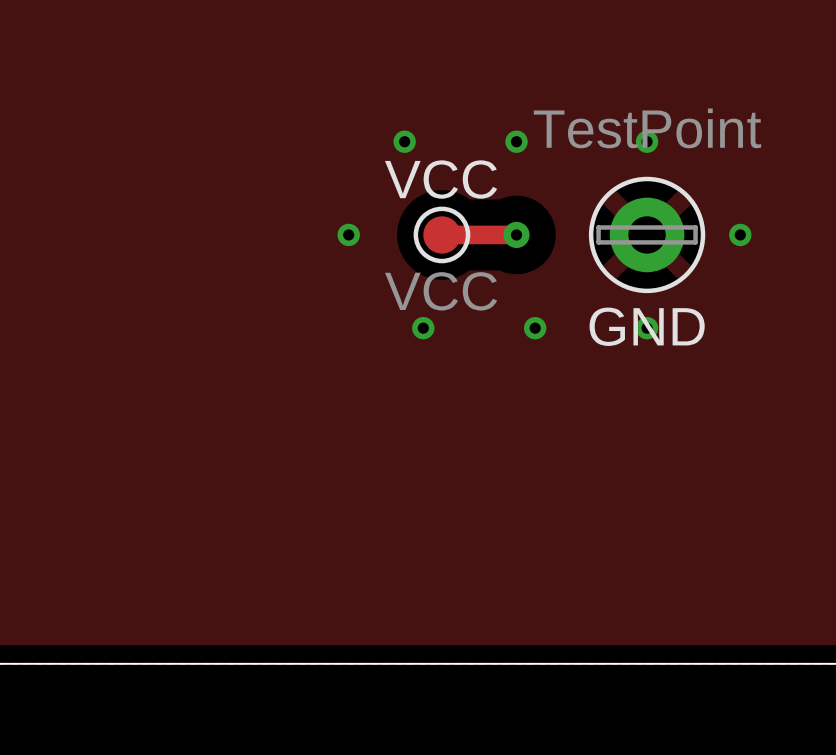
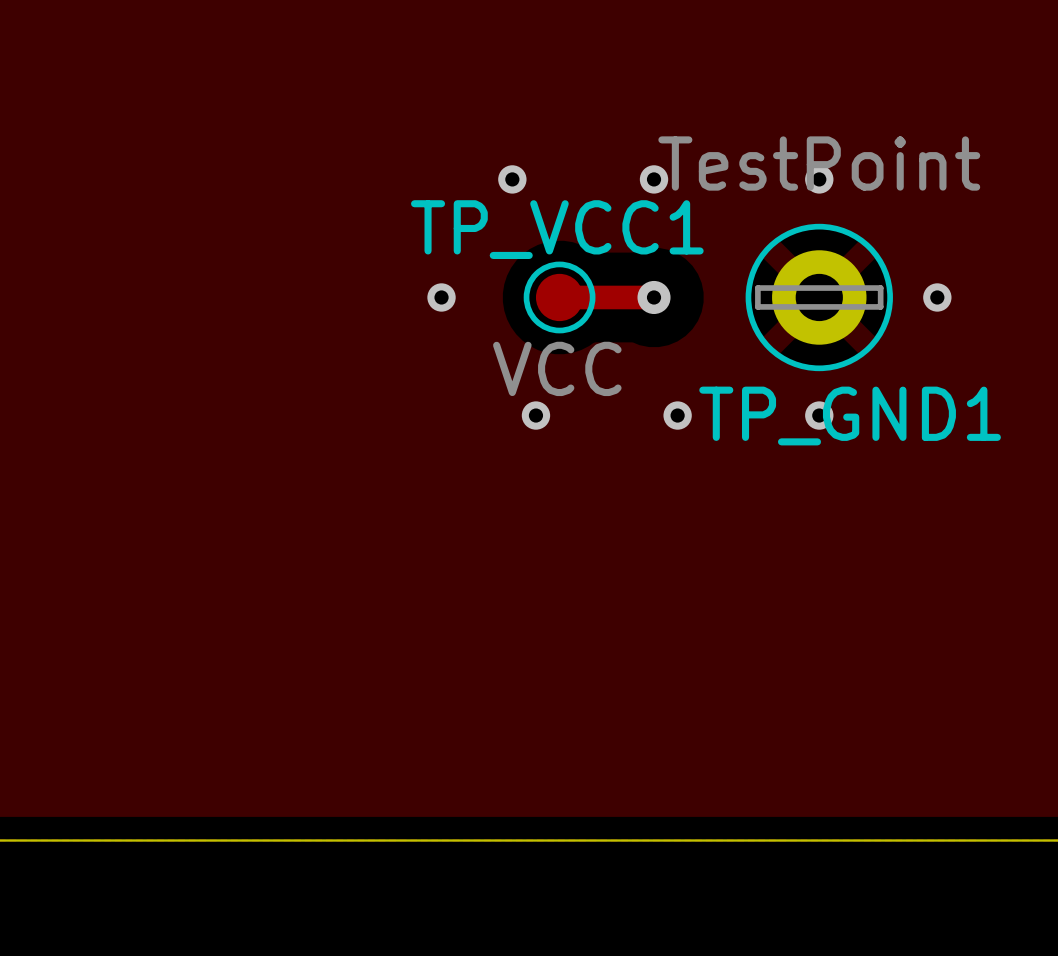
VCC name: VCC (441, 179) -> TP_VCC1 (557, 229)
GND name: GND (647, 326) -> TP_GND1 (850, 416)

